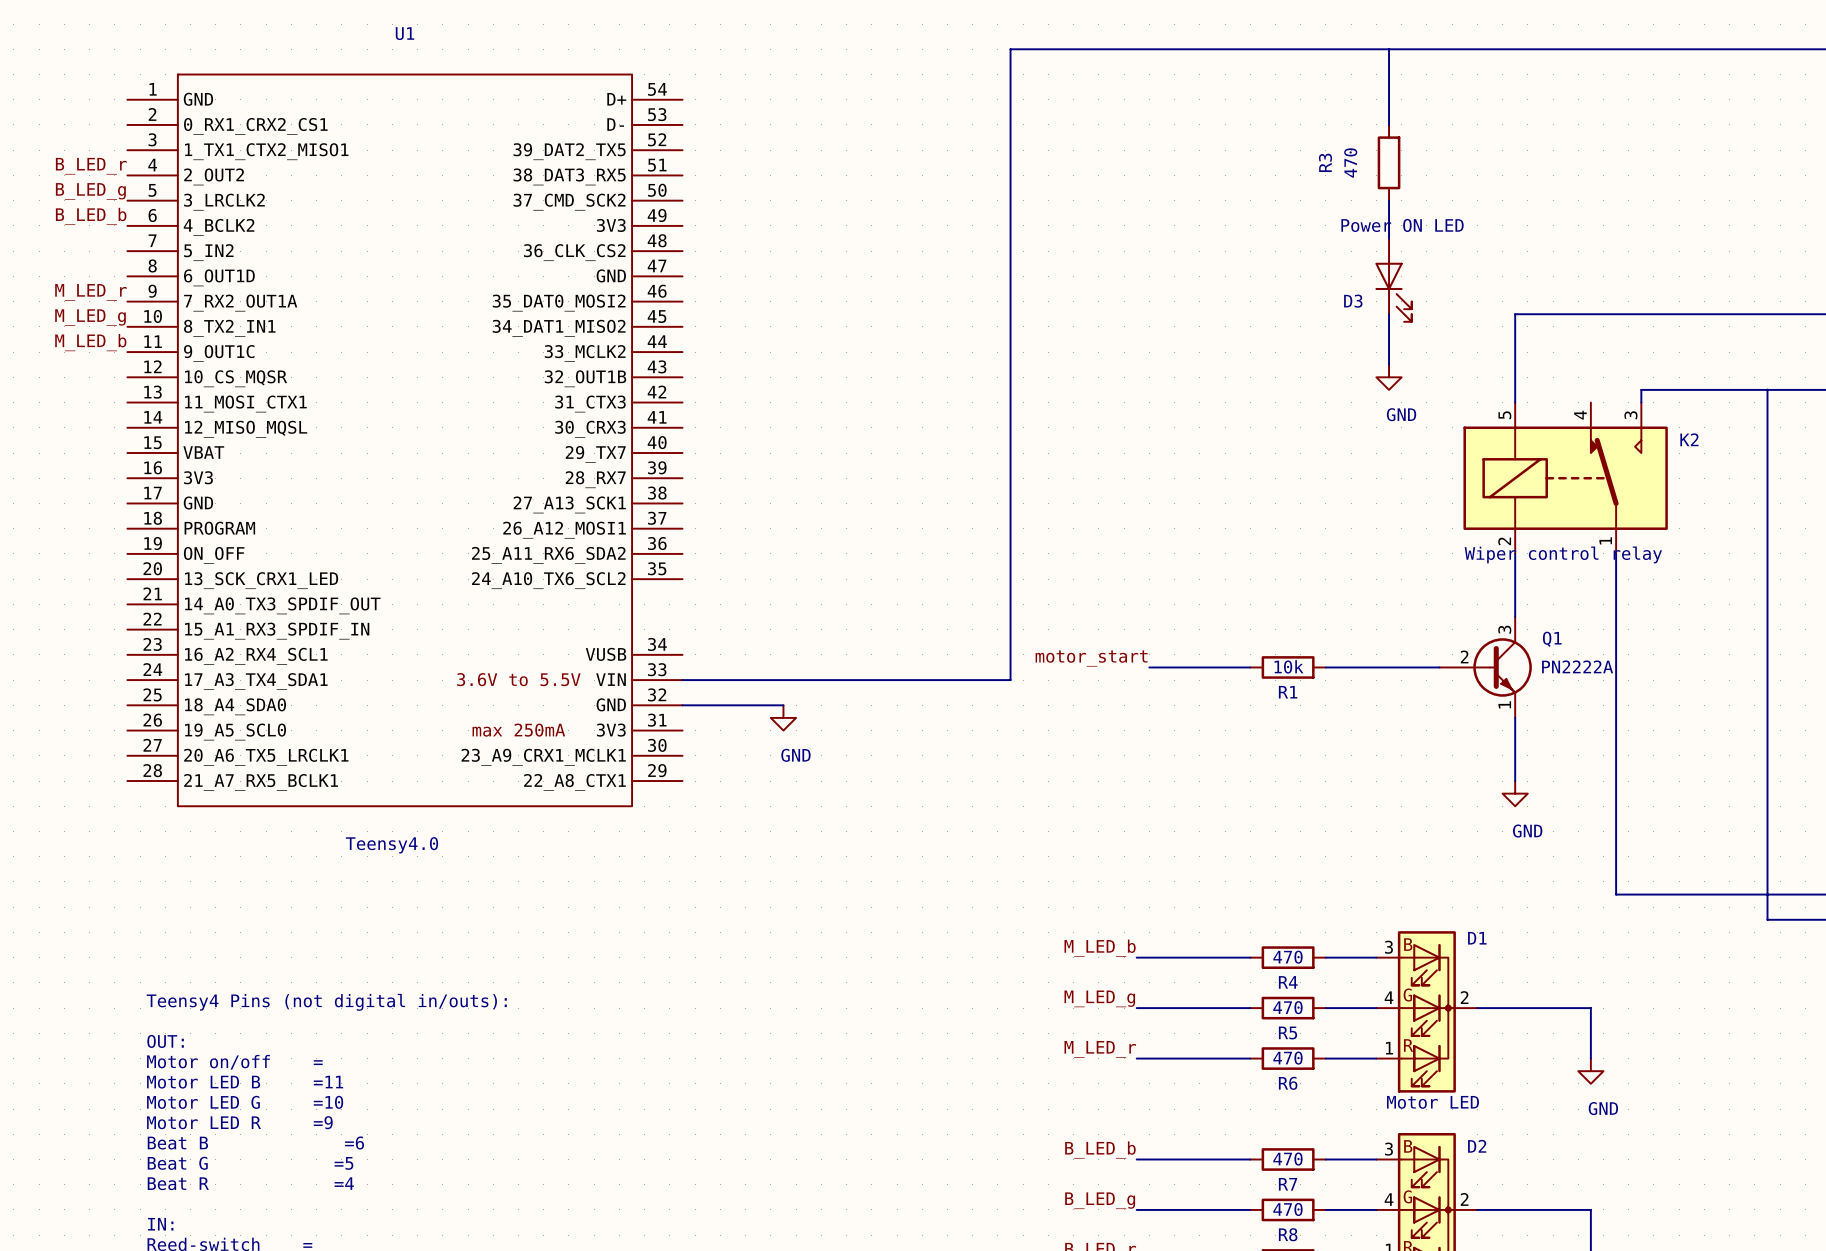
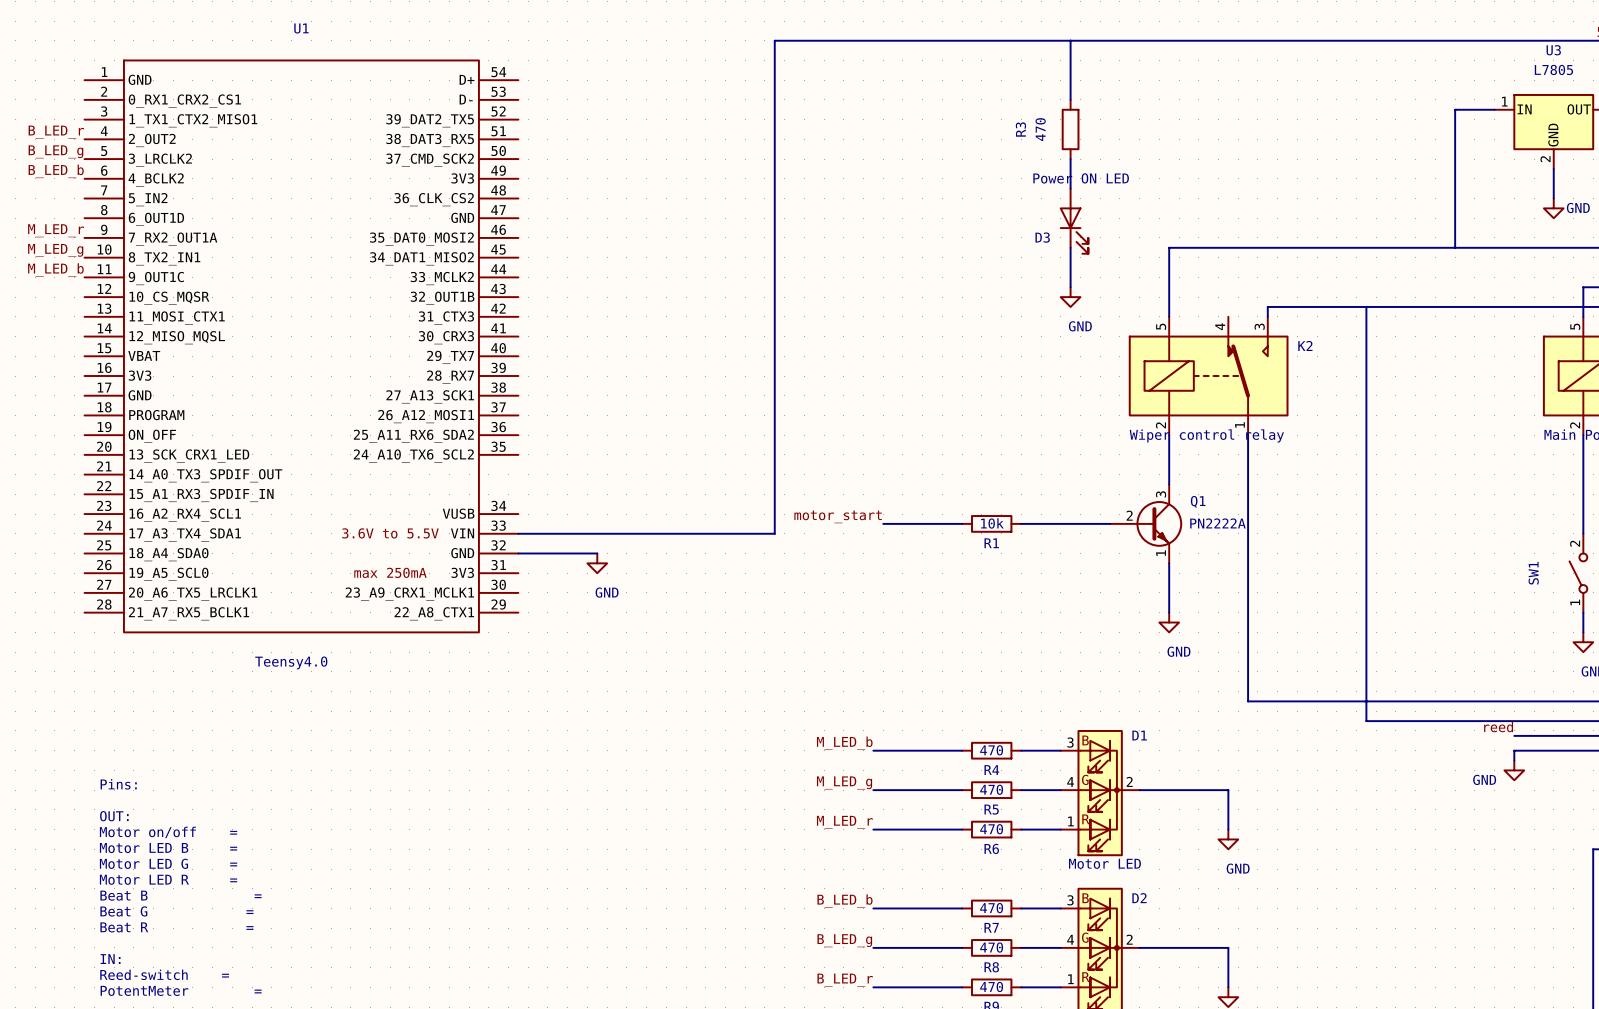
text: Teensy4 Pins (not digital in/outs): (326, 1002) -> Pins: (118, 784)
text: Motor LED B =11 (245, 1082) -> Motor LED B = (168, 848)
text: Motor LED G =10 (245, 1102) -> Motor LED G = (168, 863)
text: Motor LED R =9 (239, 1122) -> Motor LED R = (168, 879)
text: Beat B =6 (255, 1142) -> Beat B = (181, 895)
text: Beat G =5 (250, 1163) -> Beat G = (176, 911)
text: Beat R =4 (250, 1183) -> Beat R = (176, 927)

